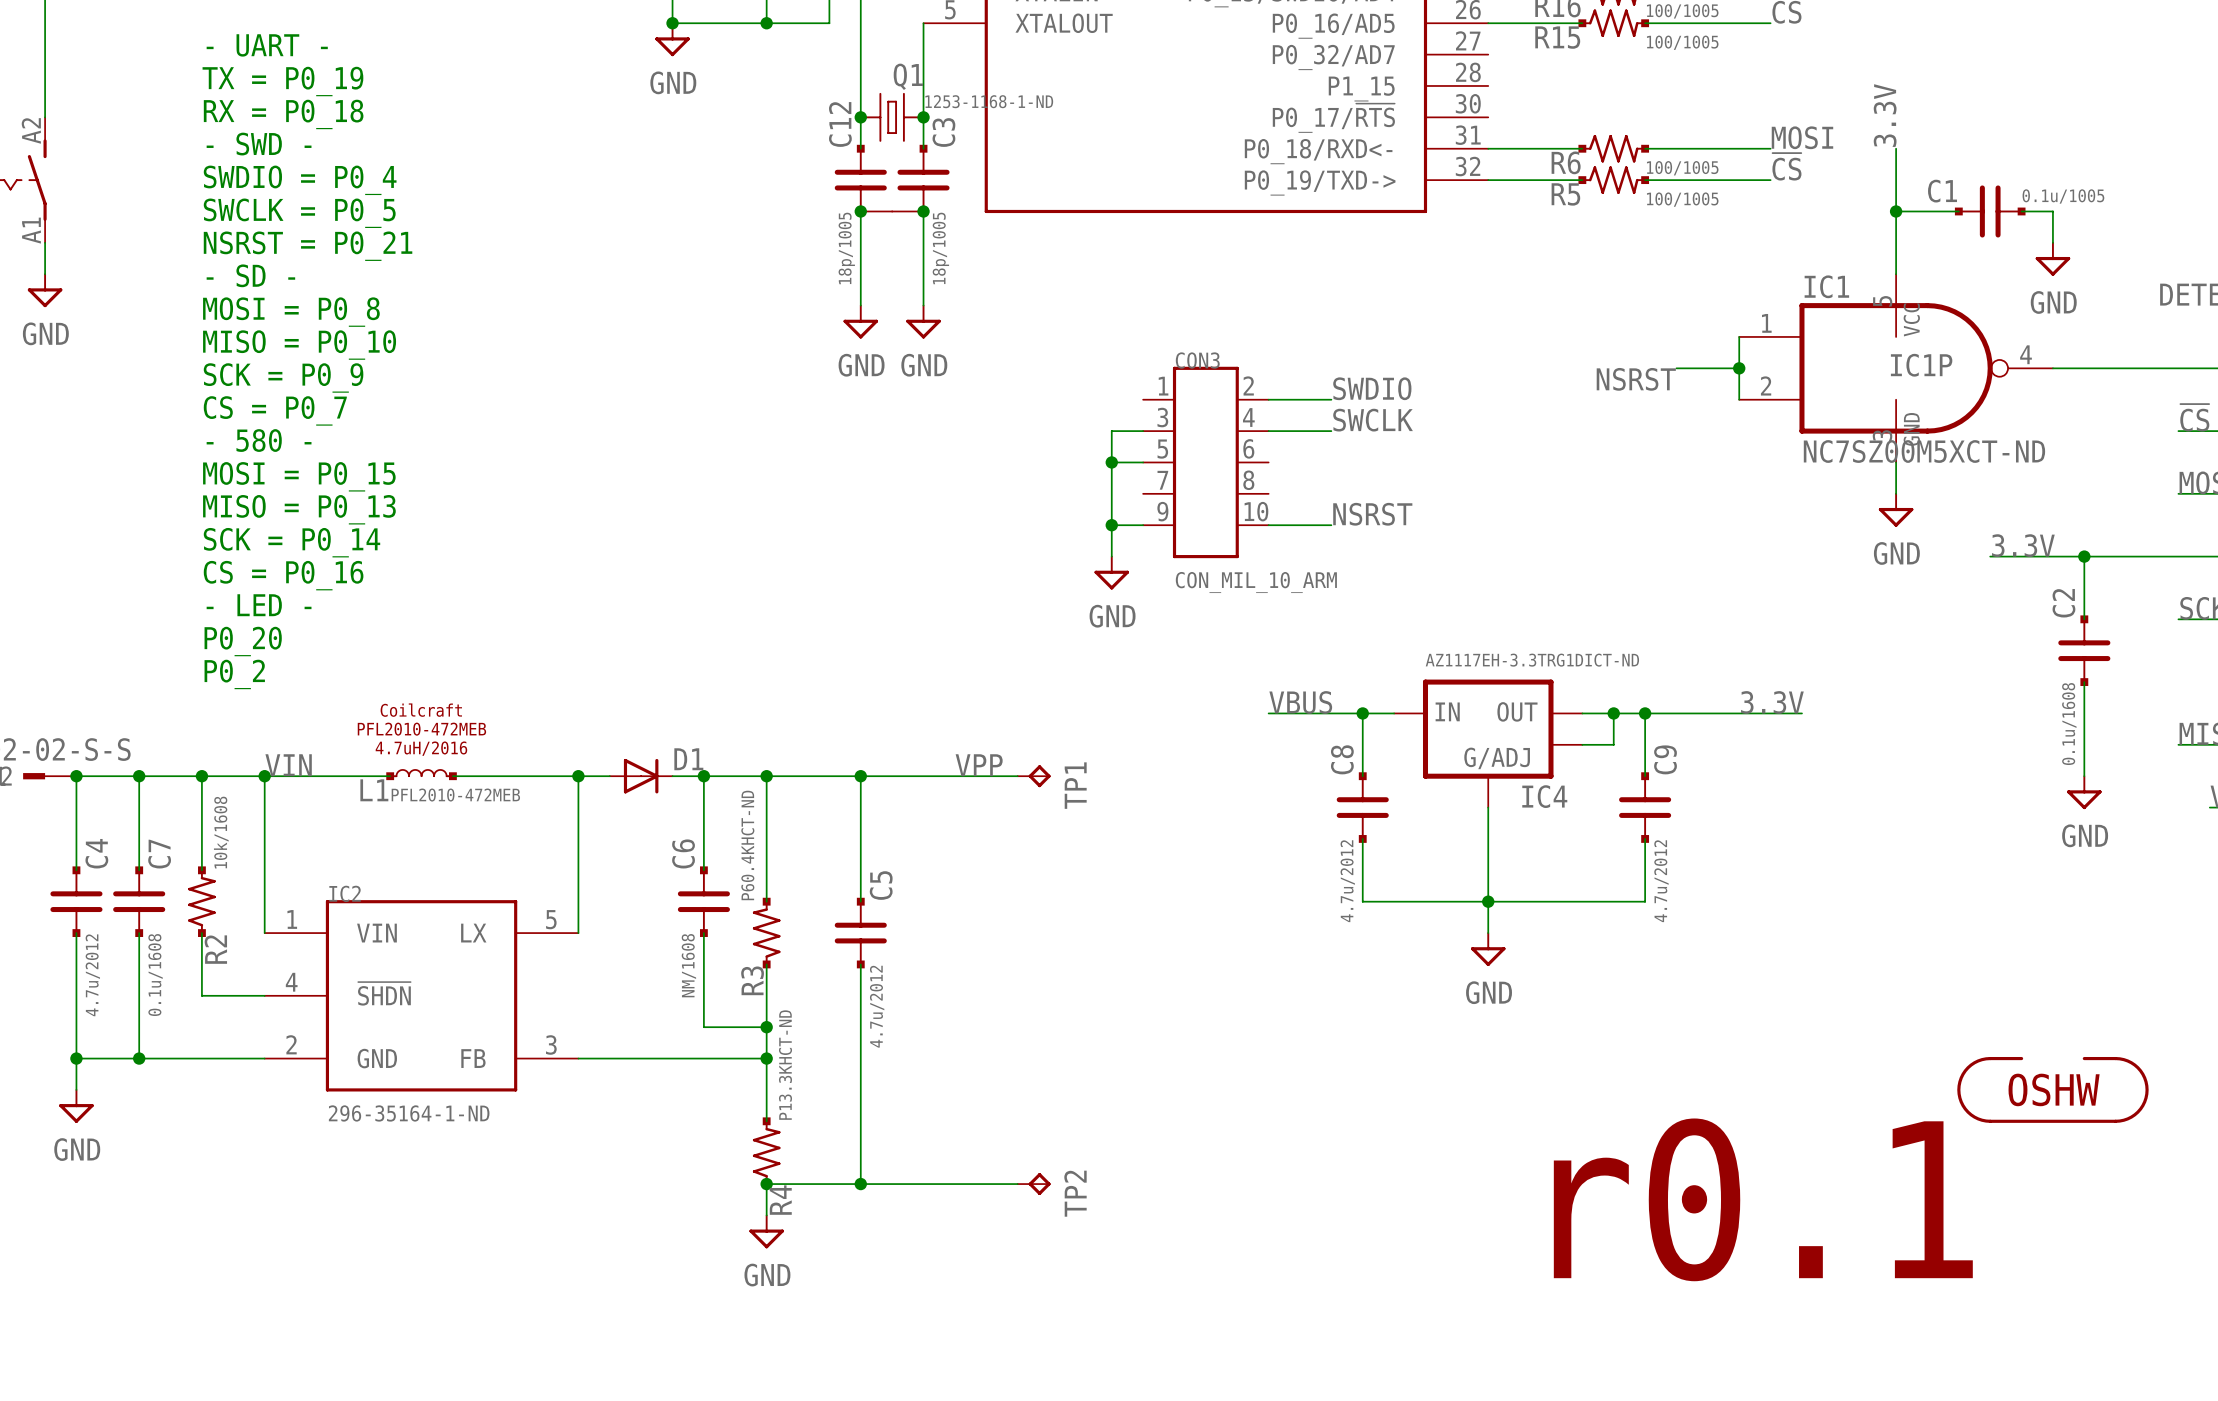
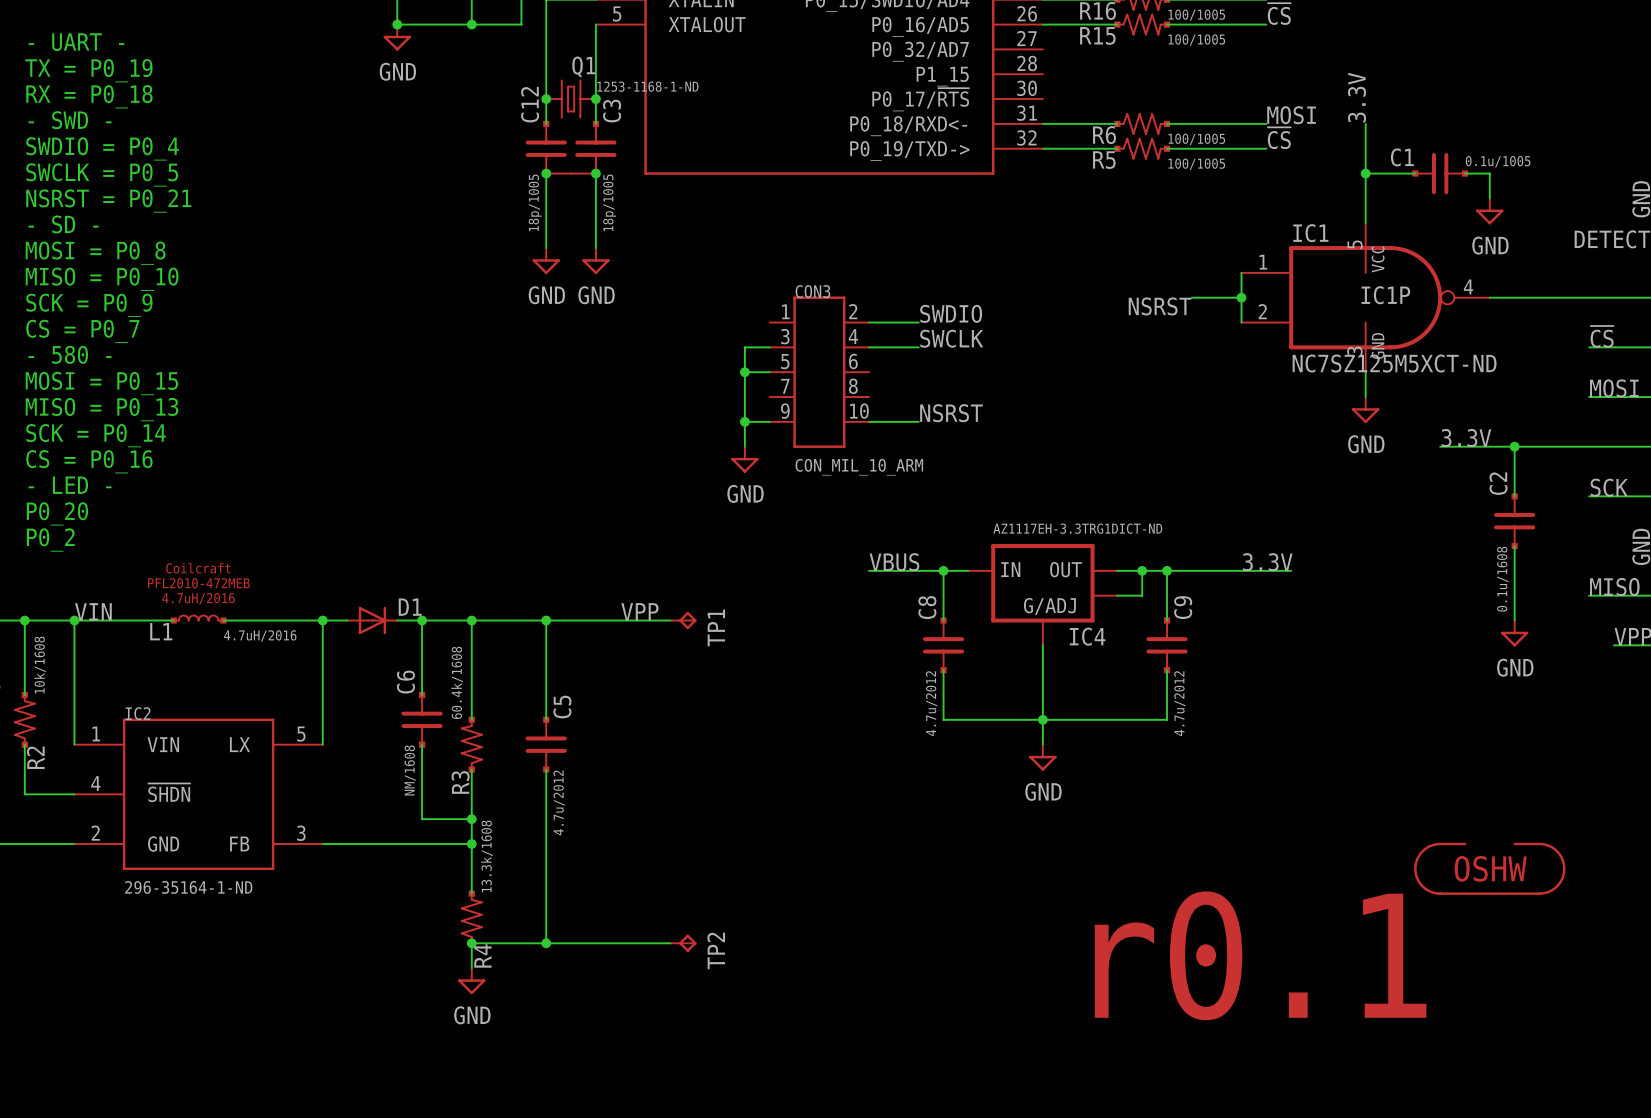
IC1 value: NC7SZ00M5XCT-ND (1924, 451) -> NC7SZ125M5XCT-ND (1394, 363)
L1 value: PFL2010-472MEB (455, 795) -> 4.7uH/2016 (260, 635)
R3 value: P60.4KHCT-ND (747, 845) -> 60.4k/1608 (457, 682)
R4 value: P13.3KHCT-ND (785, 1065) -> 13.3k/1608 (487, 856)

